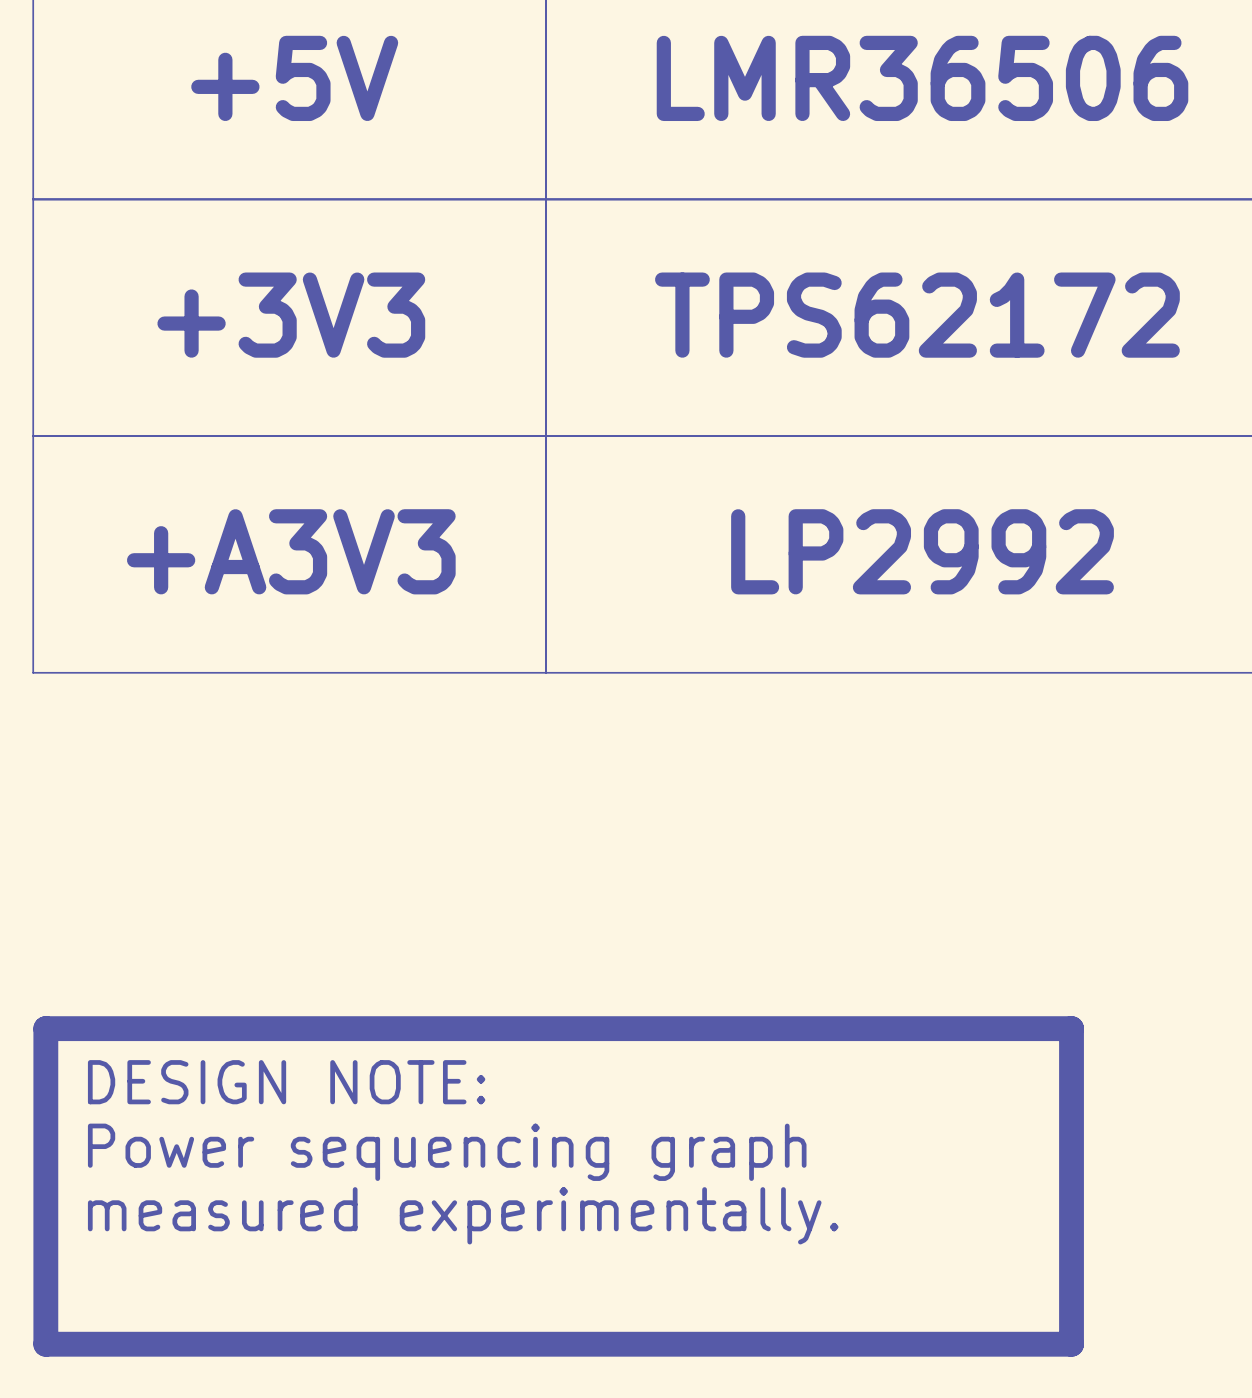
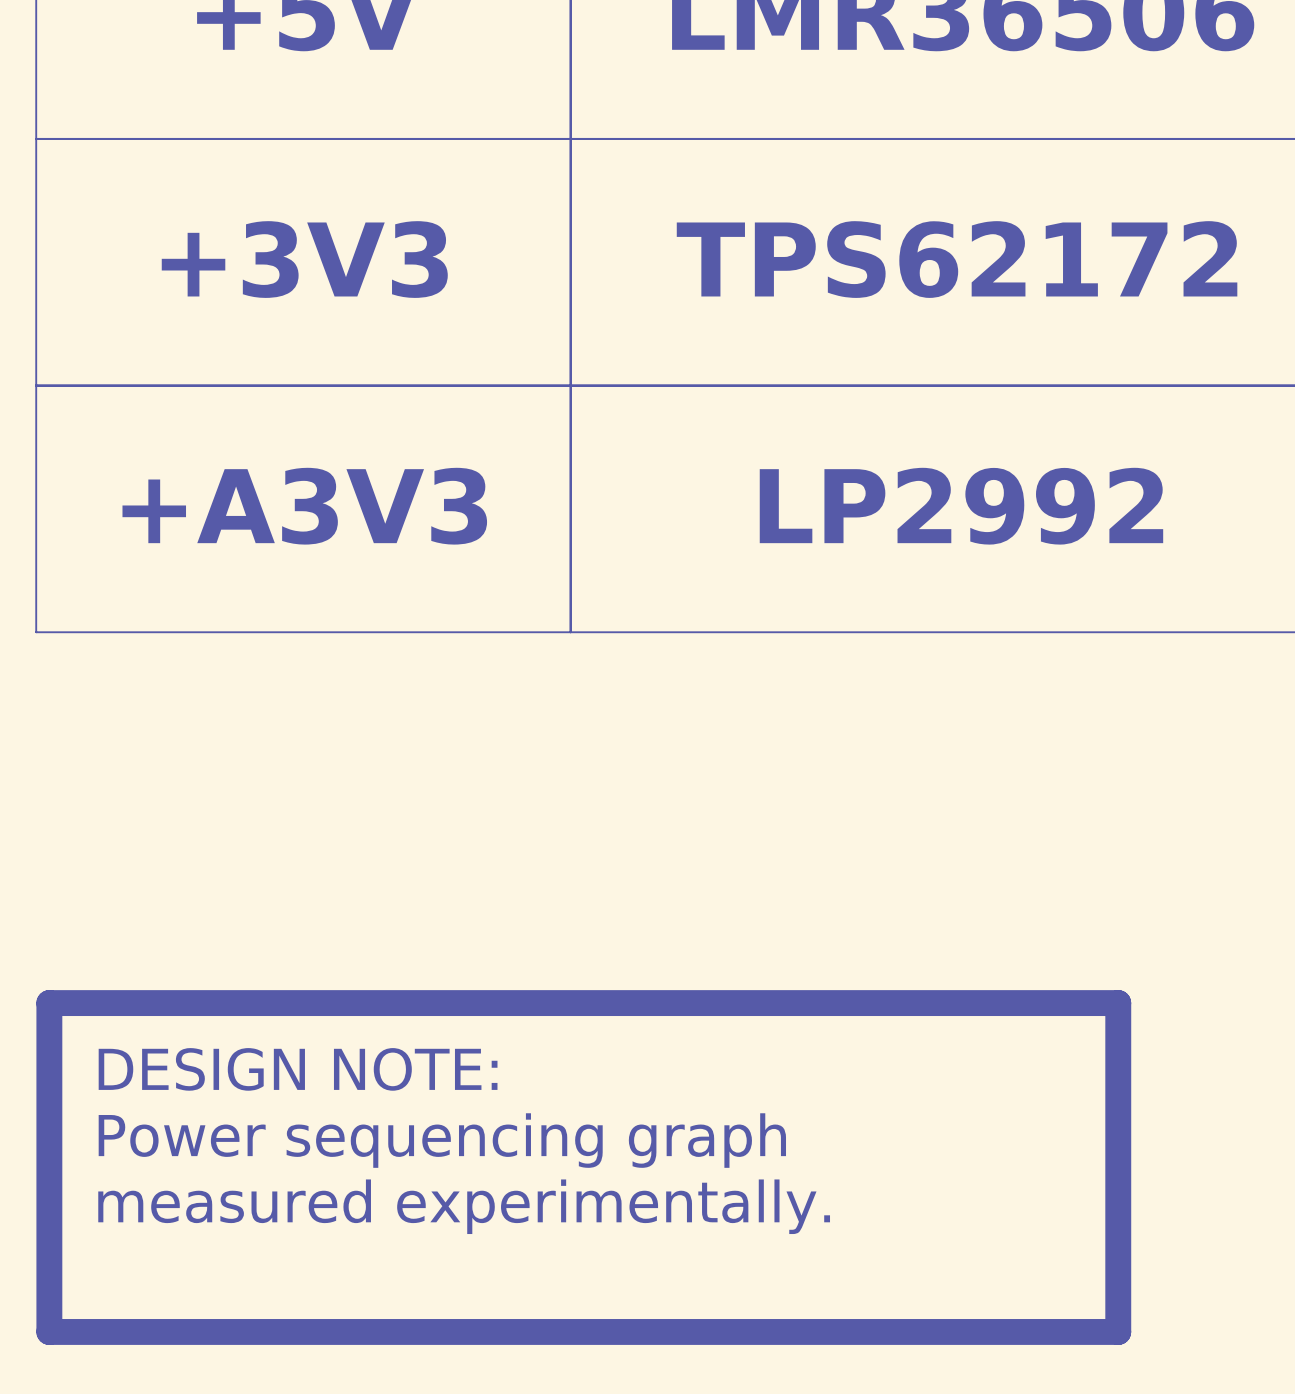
text position: DESIGN NOTE: (286, 1082) -> DESIGN NOTE: (298, 1069)
text position: Power sequencing graph (447, 1152) -> Power sequencing graph (442, 1140)
text position: measured experimentally. (463, 1215) -> measured experimentally. (464, 1206)

